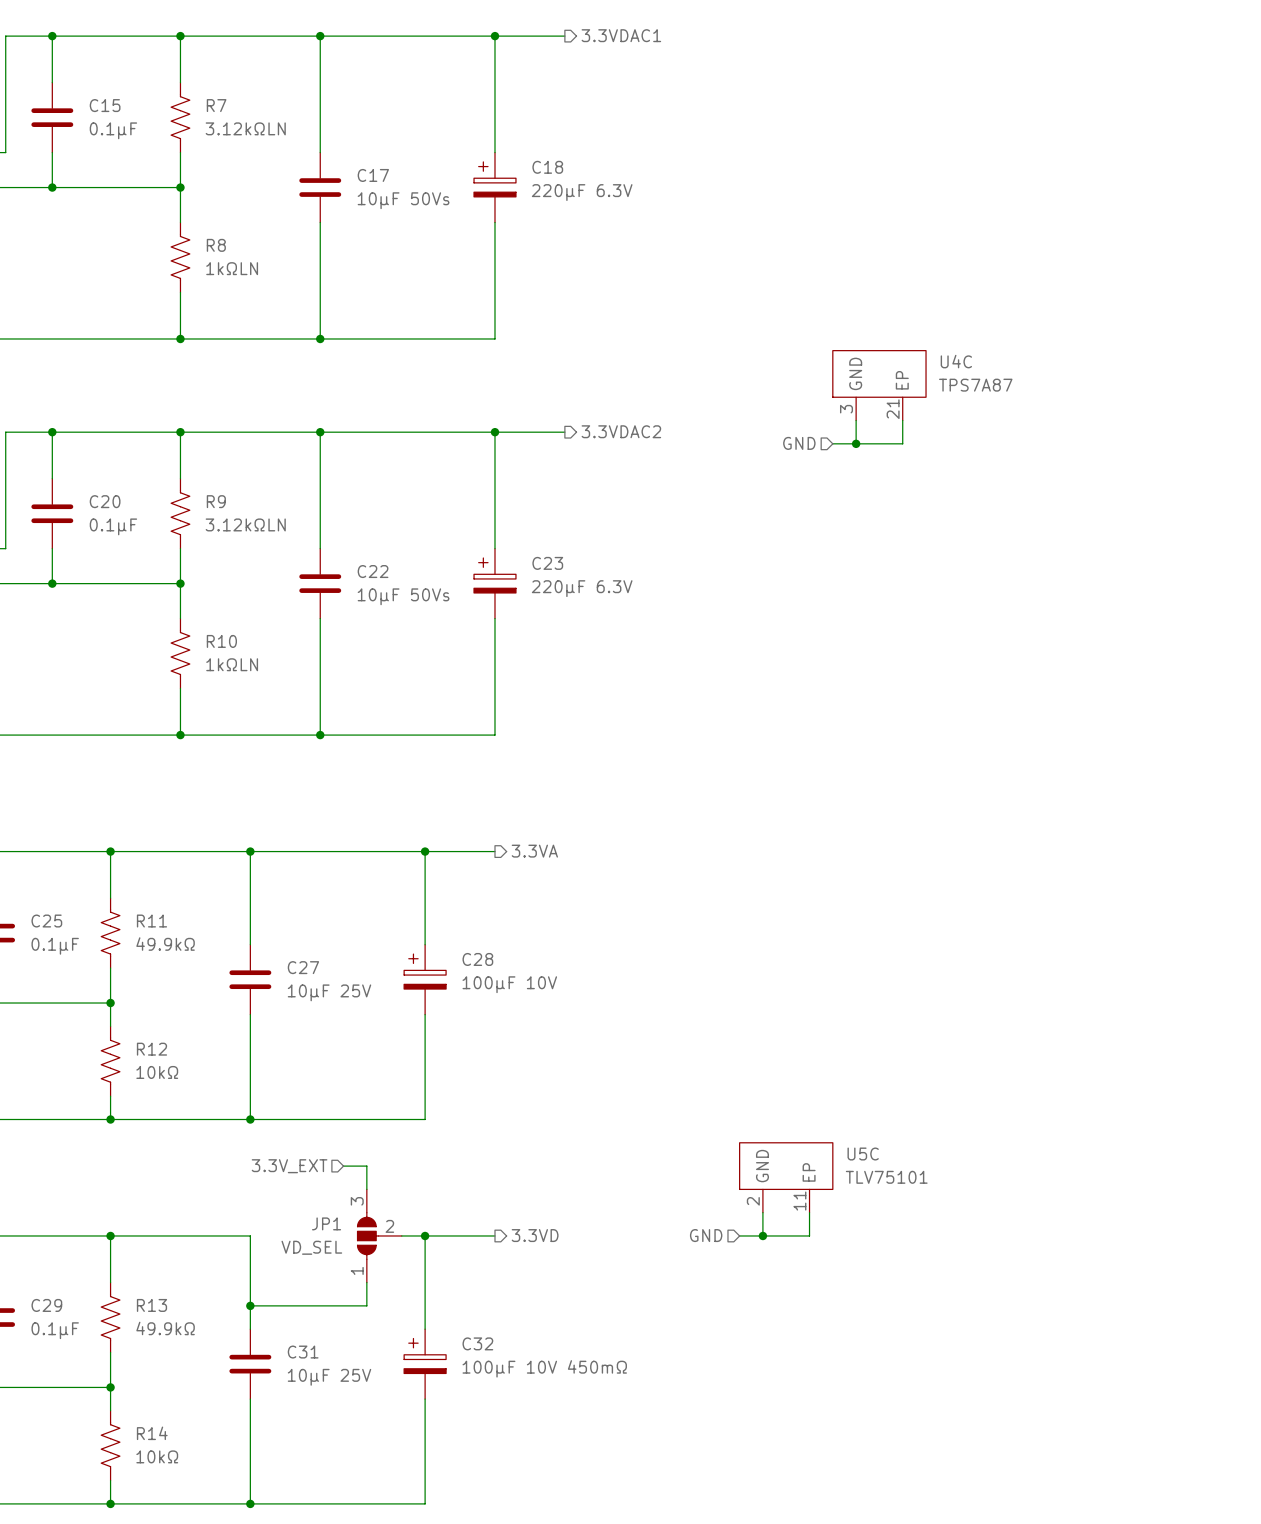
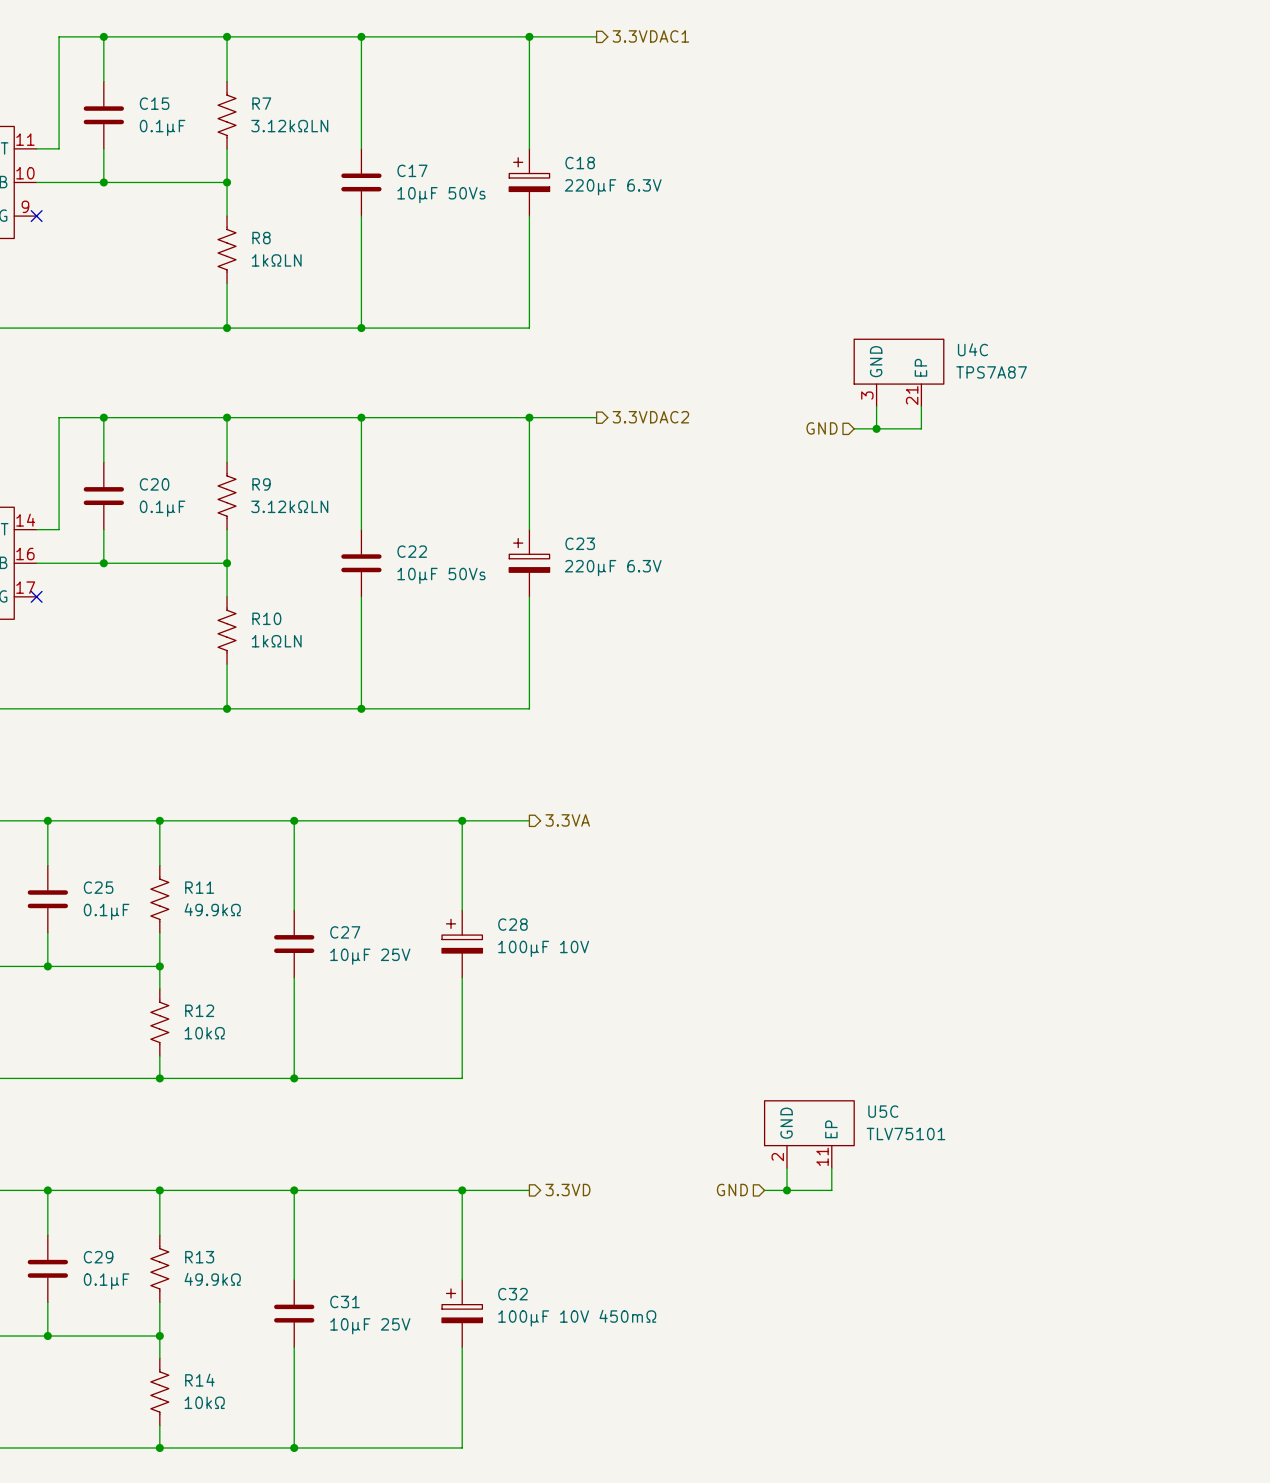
hierarchical label: 3.3V_EXT (289, 1166) -> none
wire: (343, 1166) (366, 1166) (366, 1189) -> none
wire: none -> (294, 1190) (439, 1190)
junction: none -> (294, 1190)
JP1: VD_SEL (379, 1235) -> none
wire: (366, 1282) (366, 1305) (250, 1305) -> none
junction: (250, 1305) -> none

